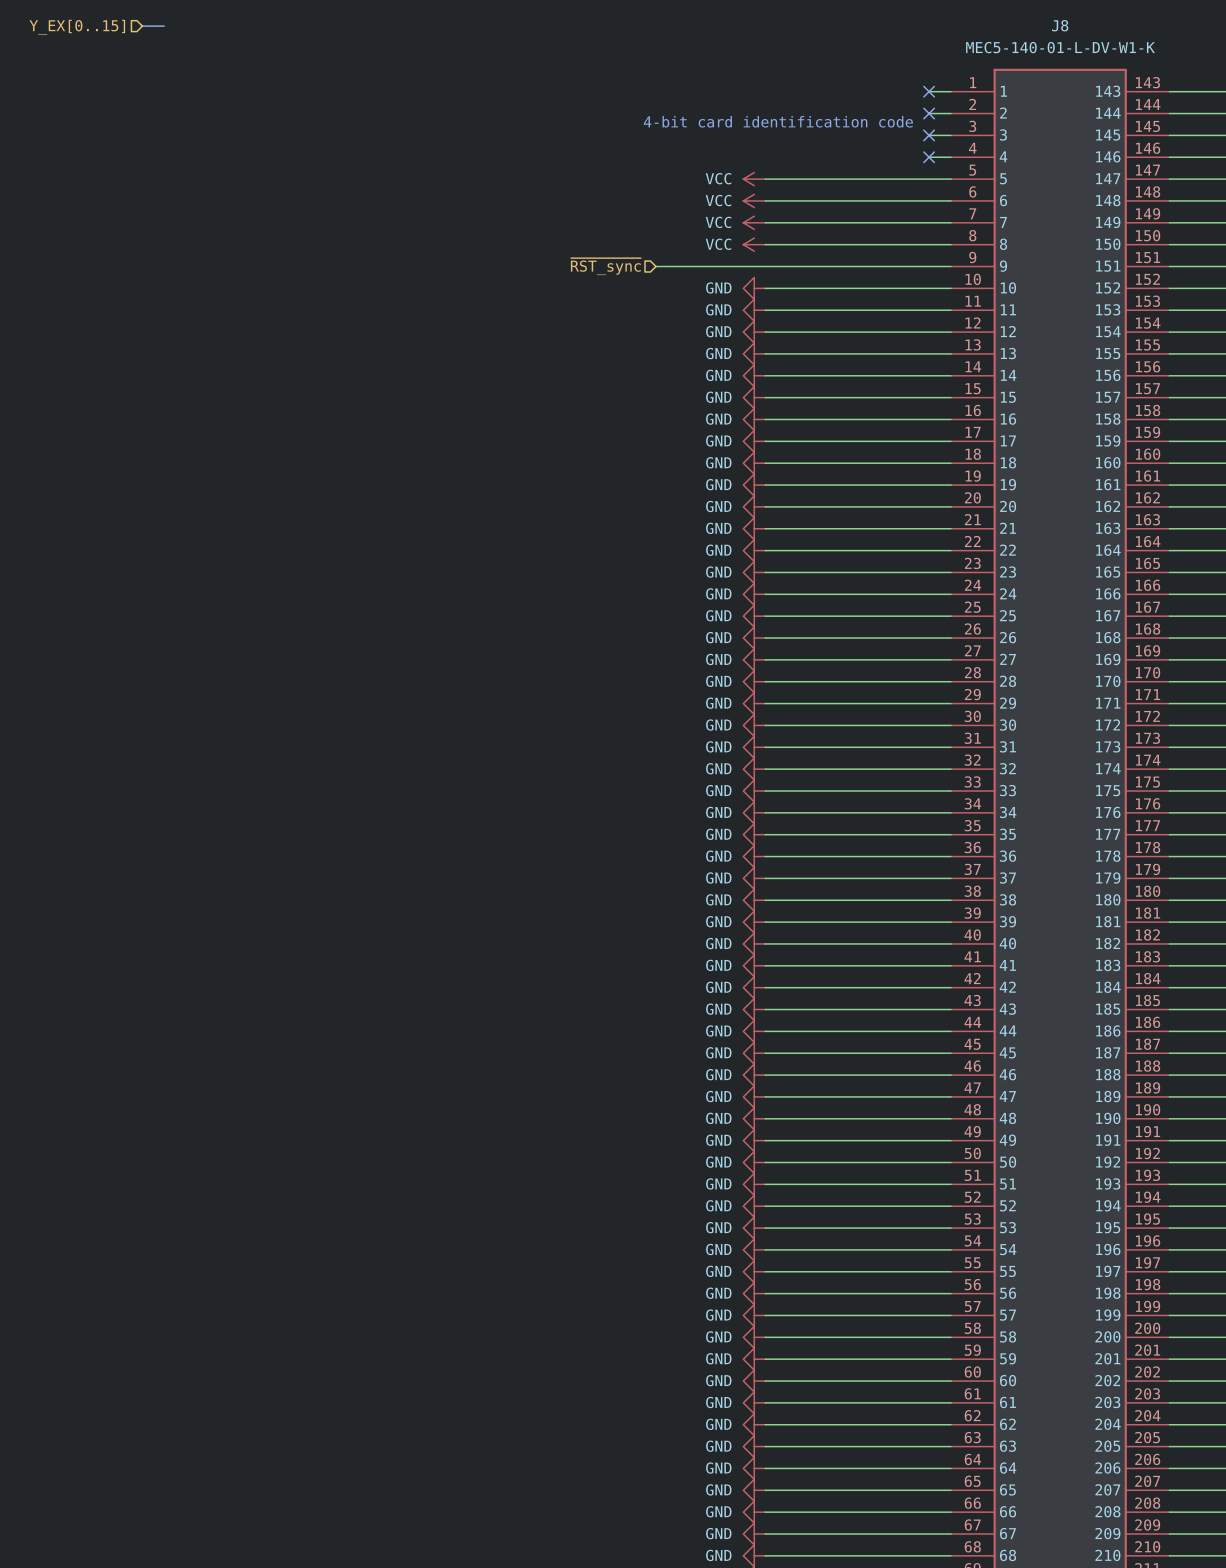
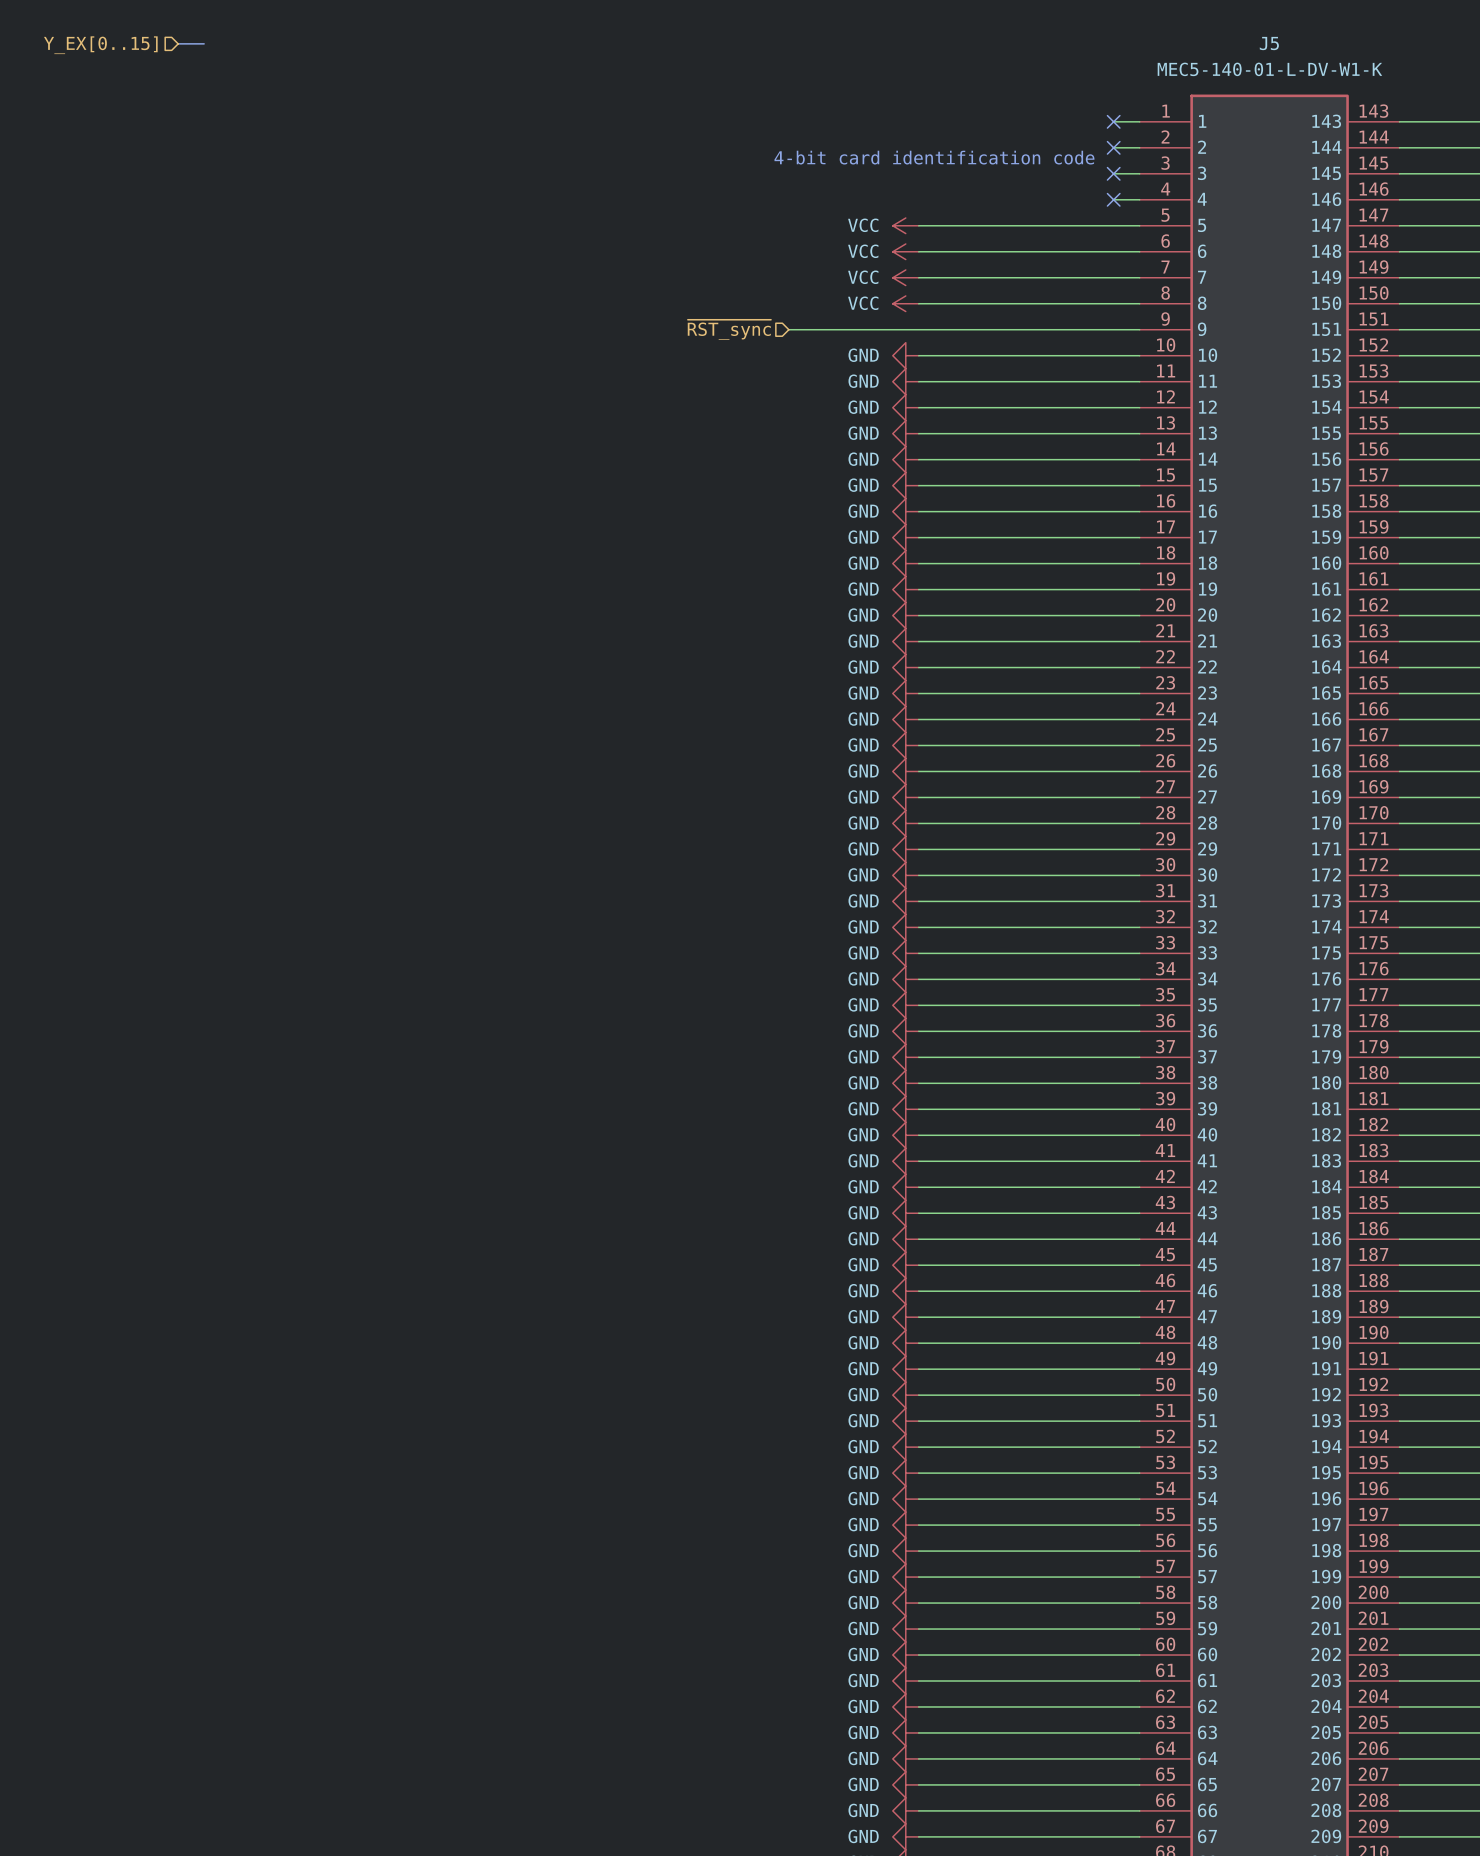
J8 name: J8 (1060, 25) -> J5 (1269, 43)

